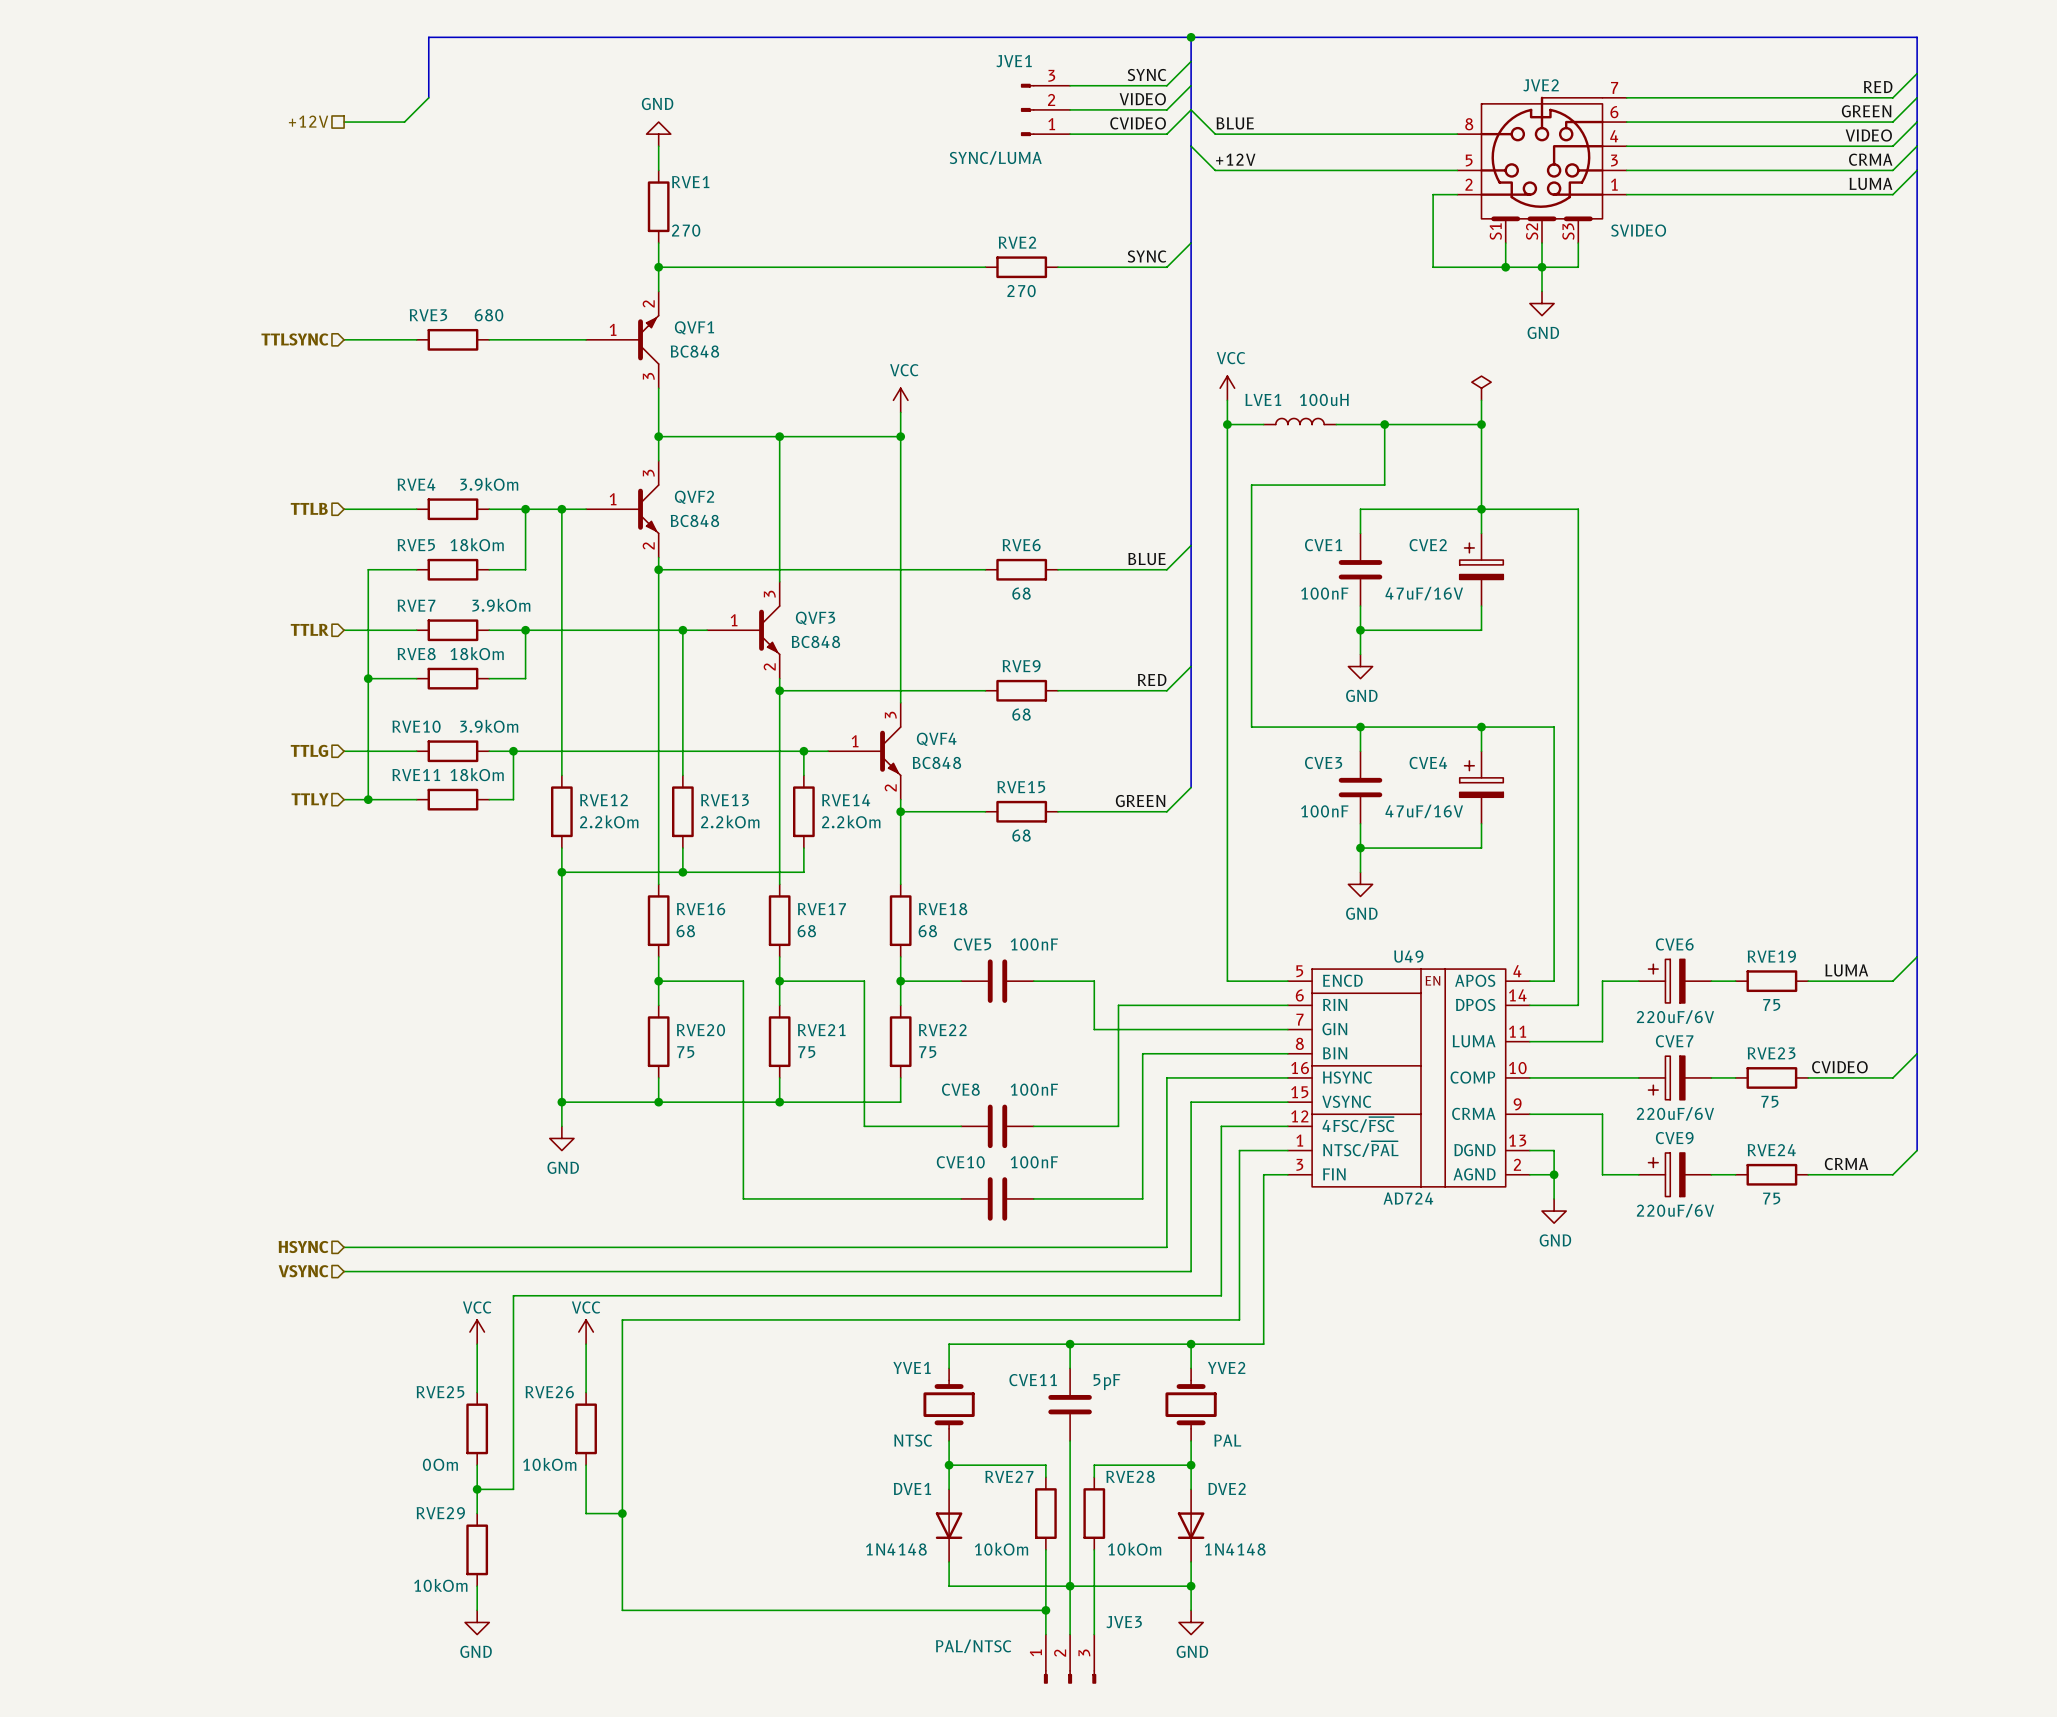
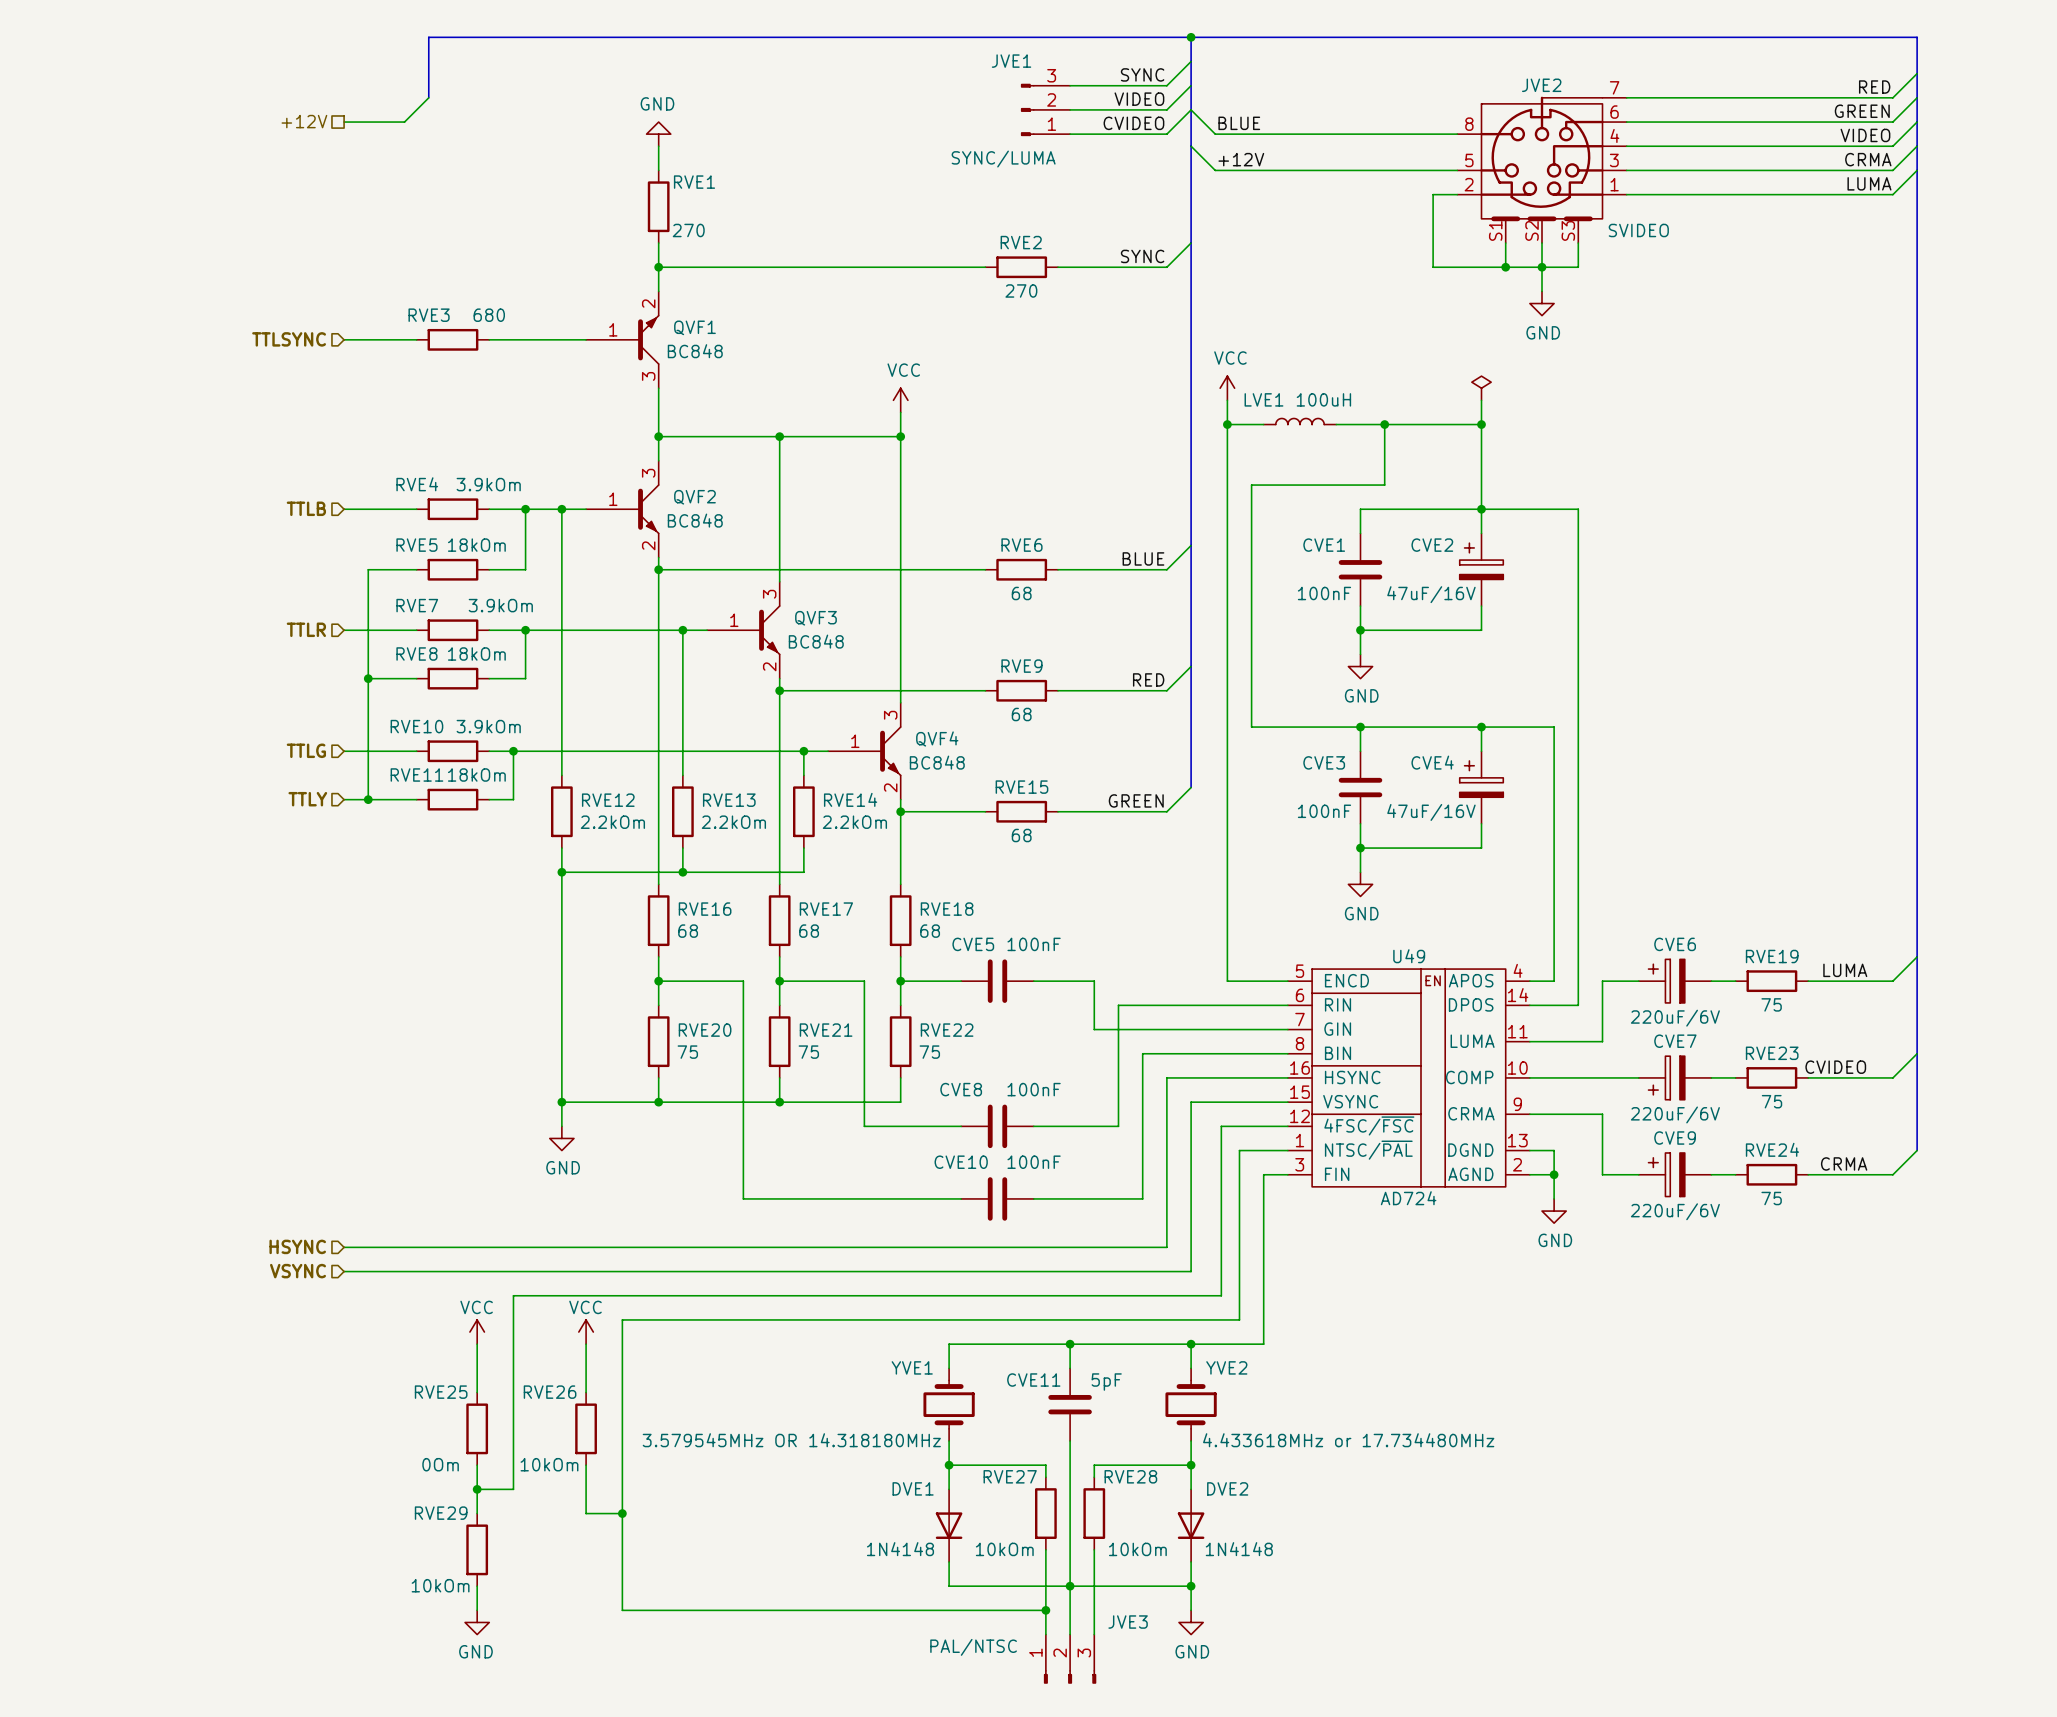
YVE1 value: NTSC (913, 1440) -> 3.579545MHz OR 14.318180MHz (791, 1440)
YVE2 value: PAL (1227, 1440) -> 4.433618MHz or 17.734480MHz (1348, 1440)

